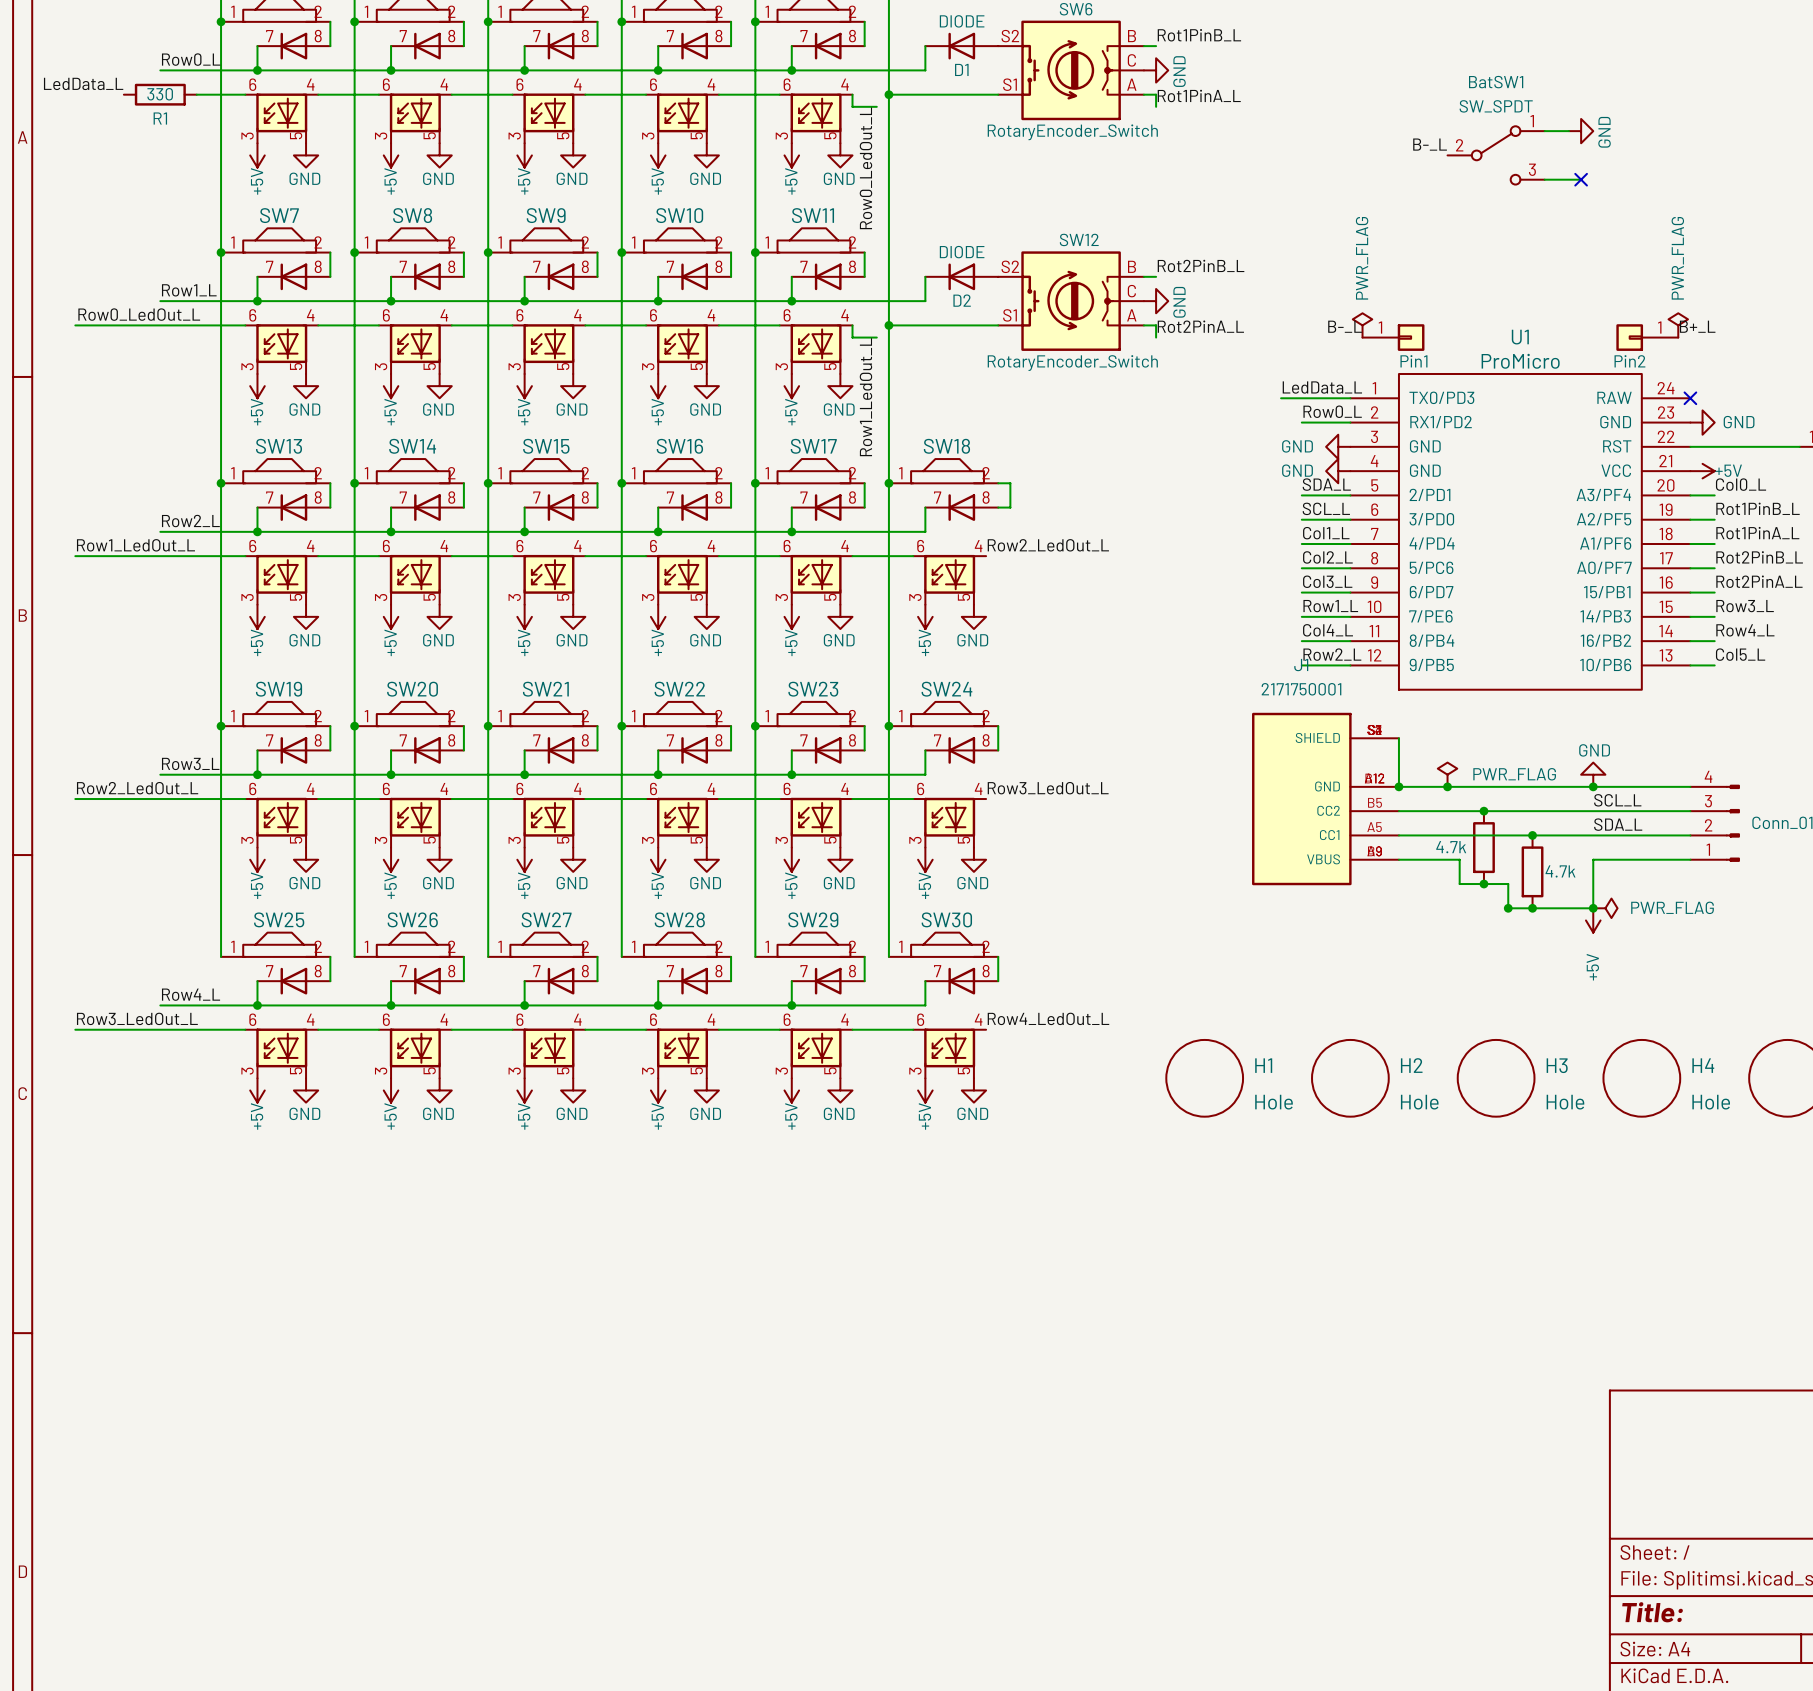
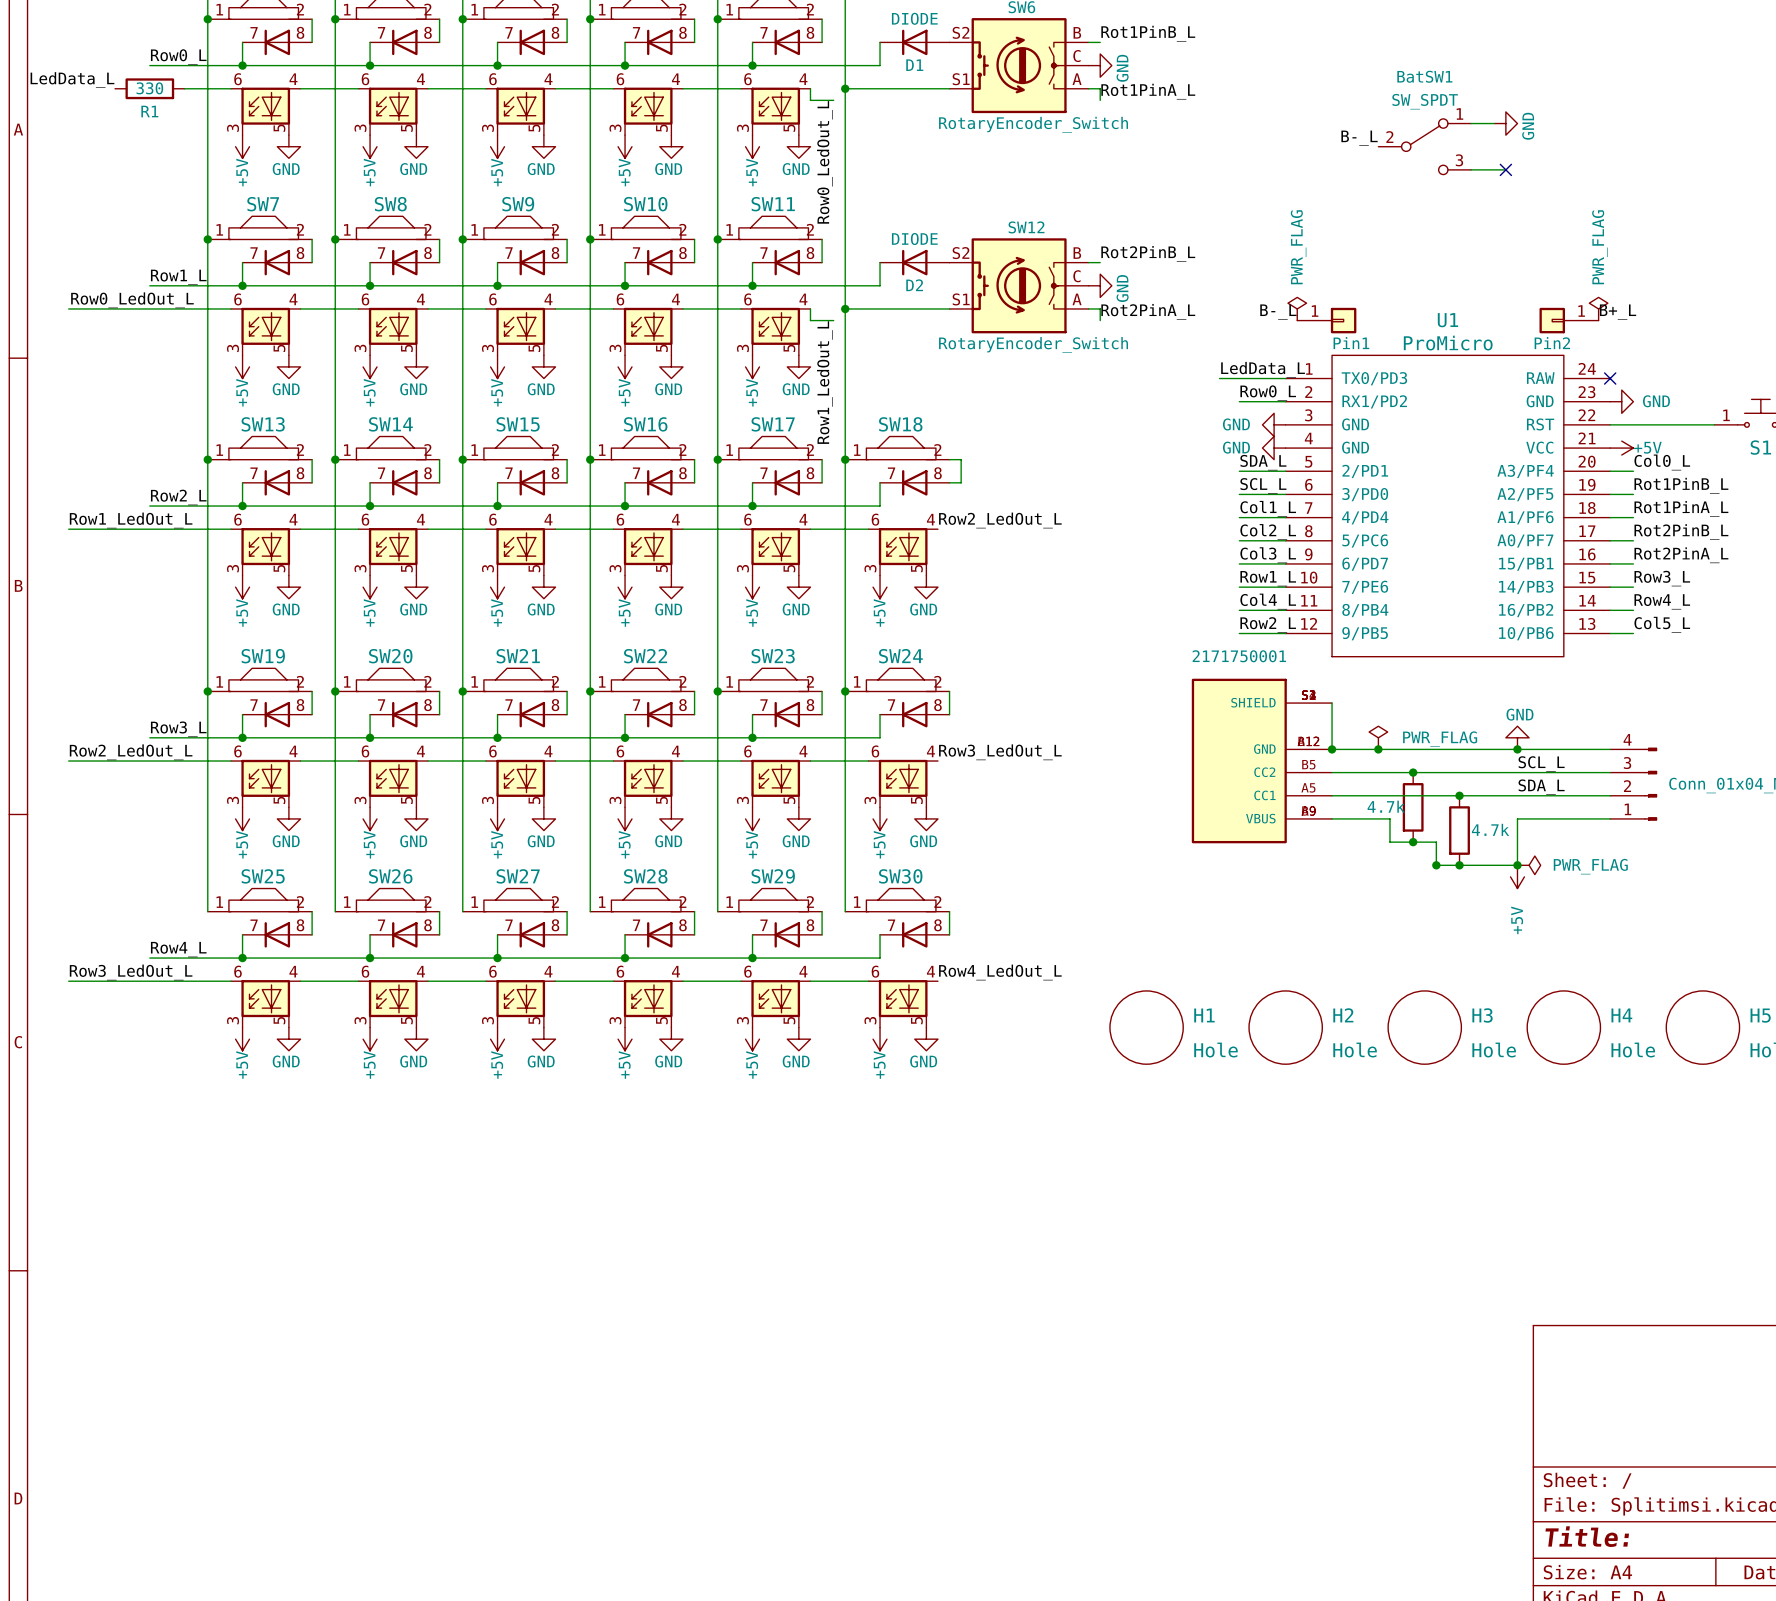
J1 name: J1 (1301, 665) -> none

